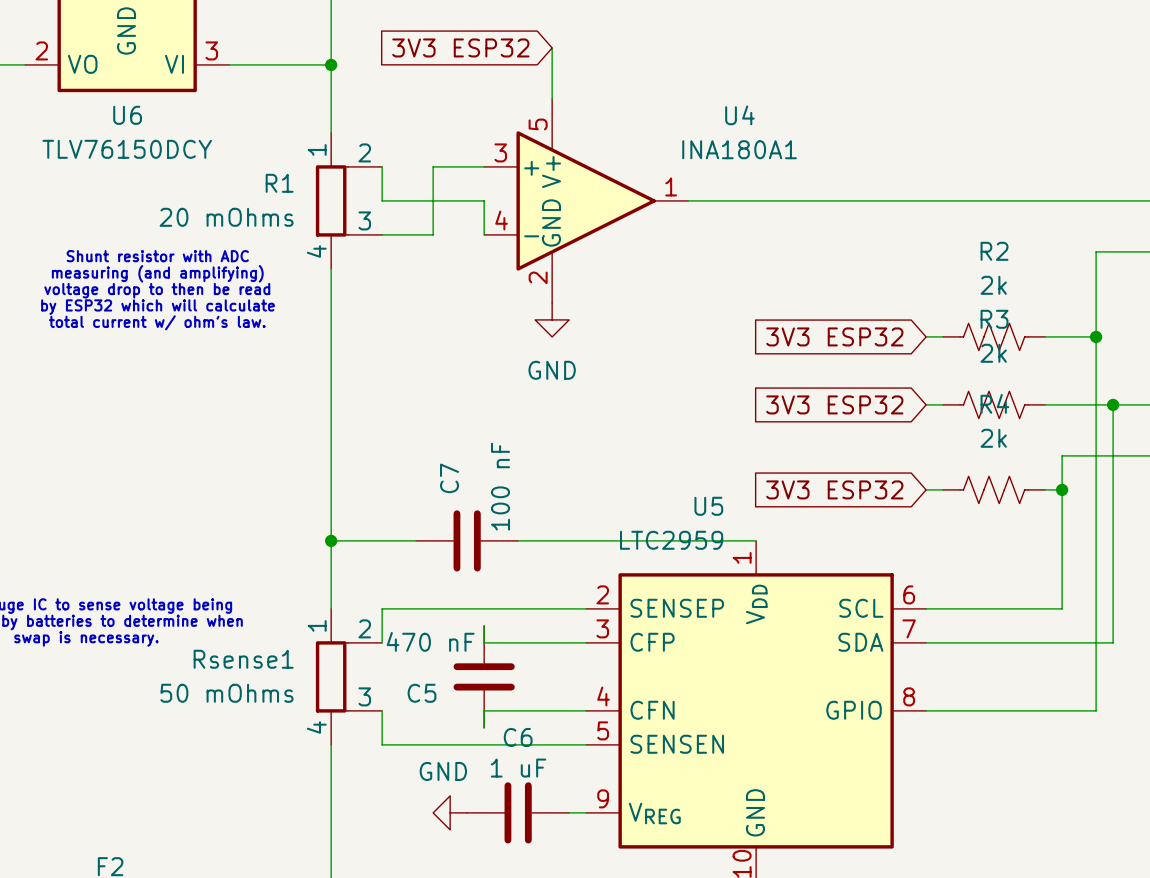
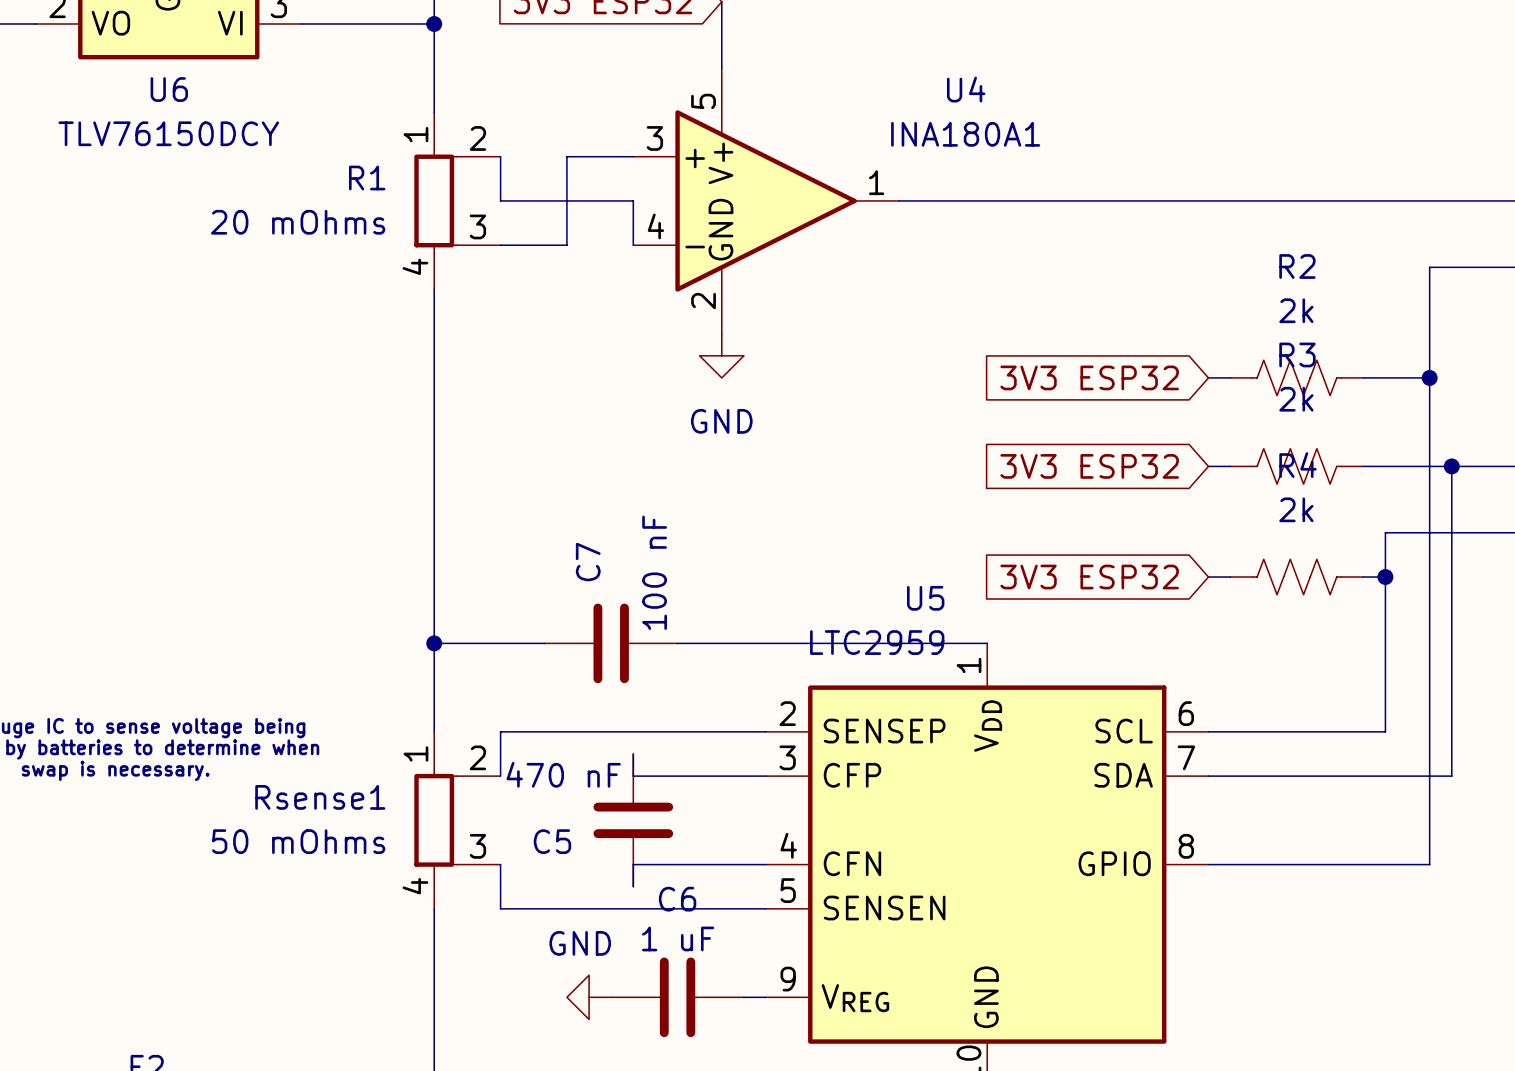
text: Shunt resistor with ADC (157, 256) -> none
text: measuring (and amplifying) (157, 273) -> none
text: voltage drop to then be read (157, 290) -> none
text: by ESP32 which will calculate (158, 307) -> none
text: total current w/ ohm's law. (157, 322) -> none

